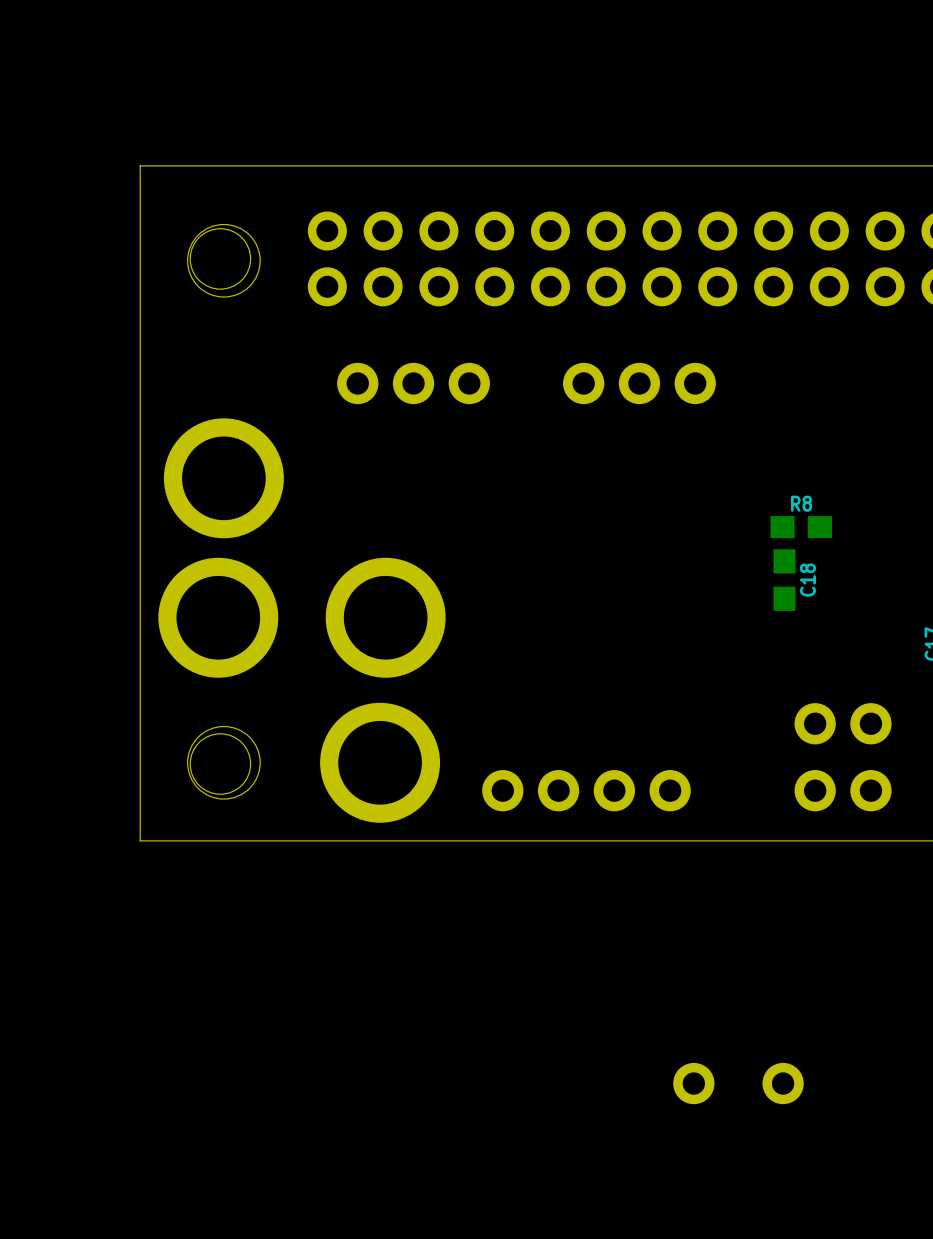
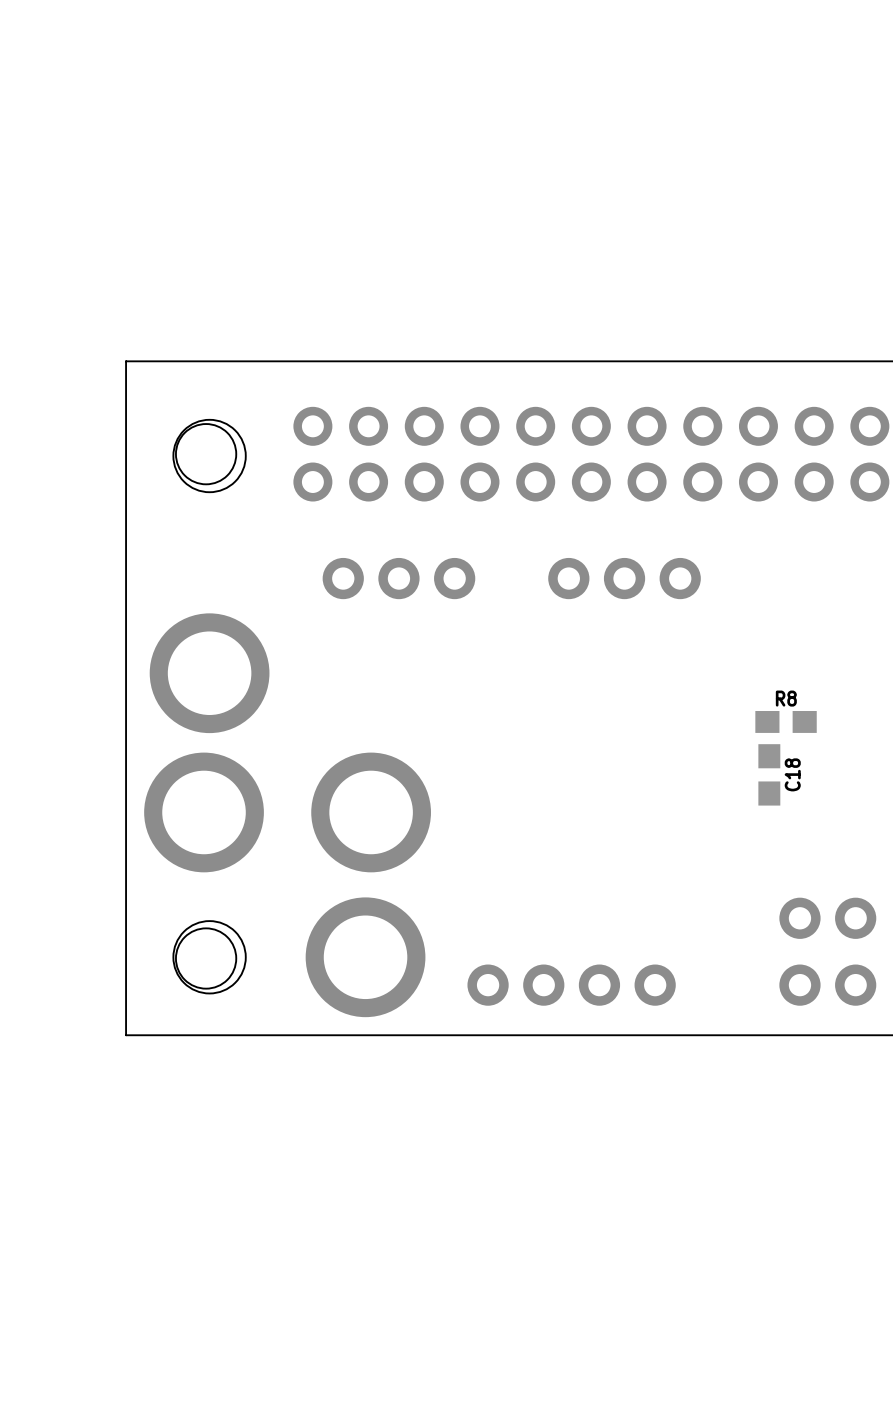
part: (693, 1083) -> none
part: (783, 1083) -> none

